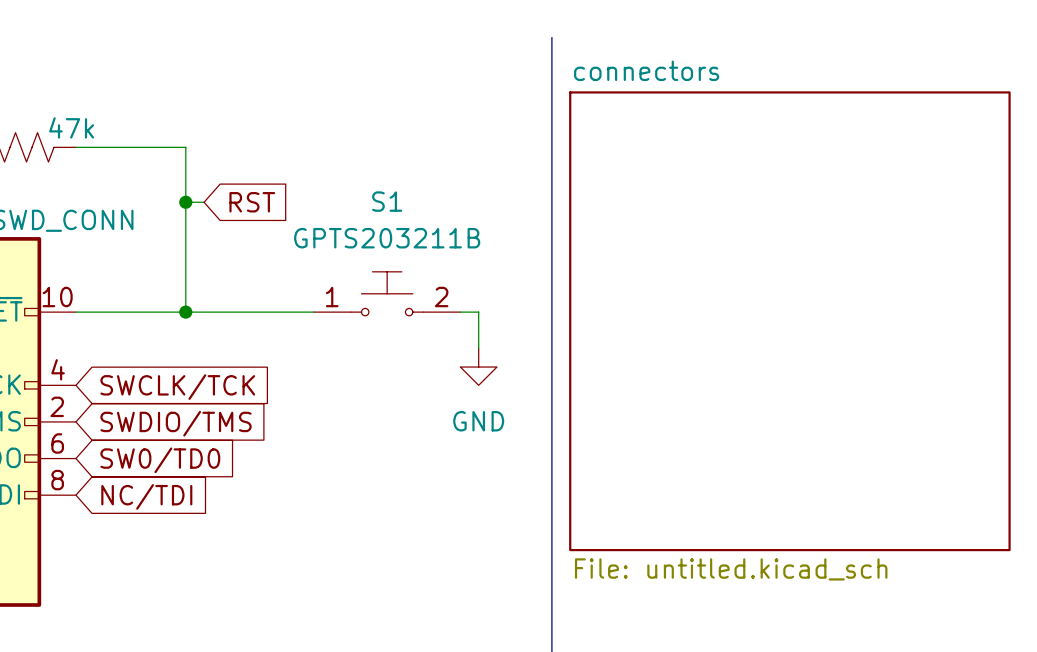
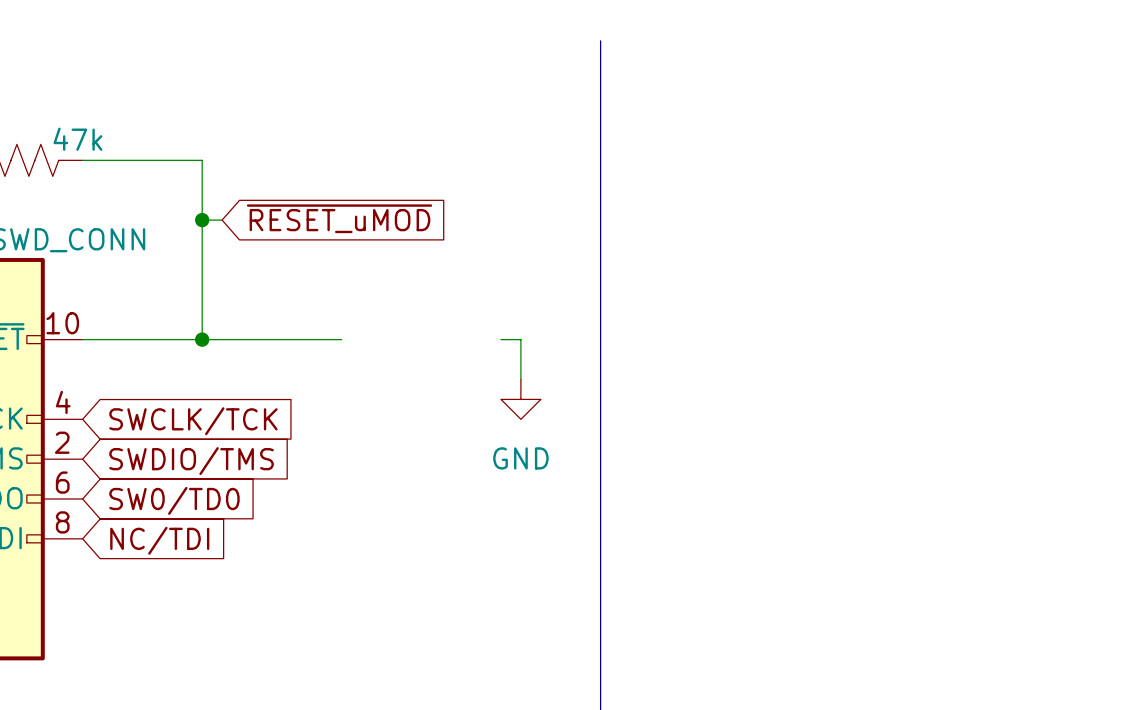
global label: RST (252, 202) -> ~{RESET_uMOD} (339, 218)
S1: GPTS203211B (387, 293) -> none
sheet connectors: File: untitled.kicad_sch (789, 321) -> none

